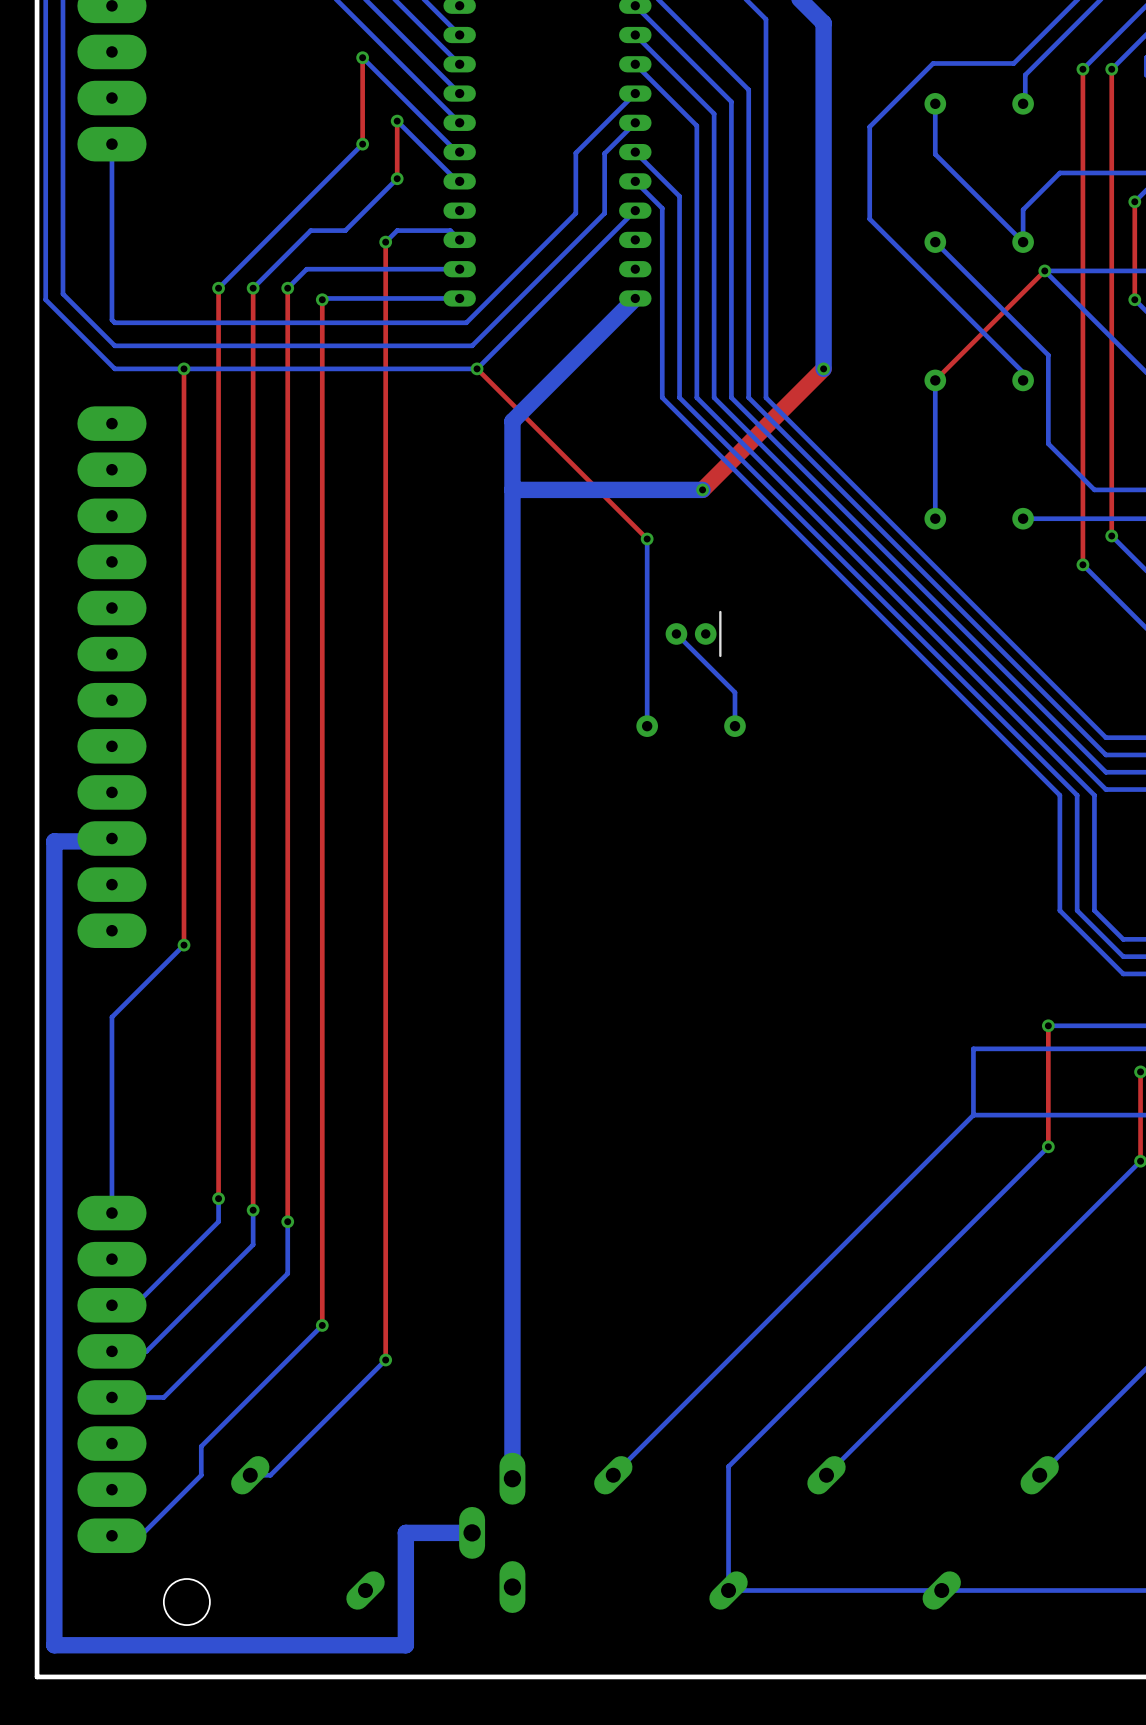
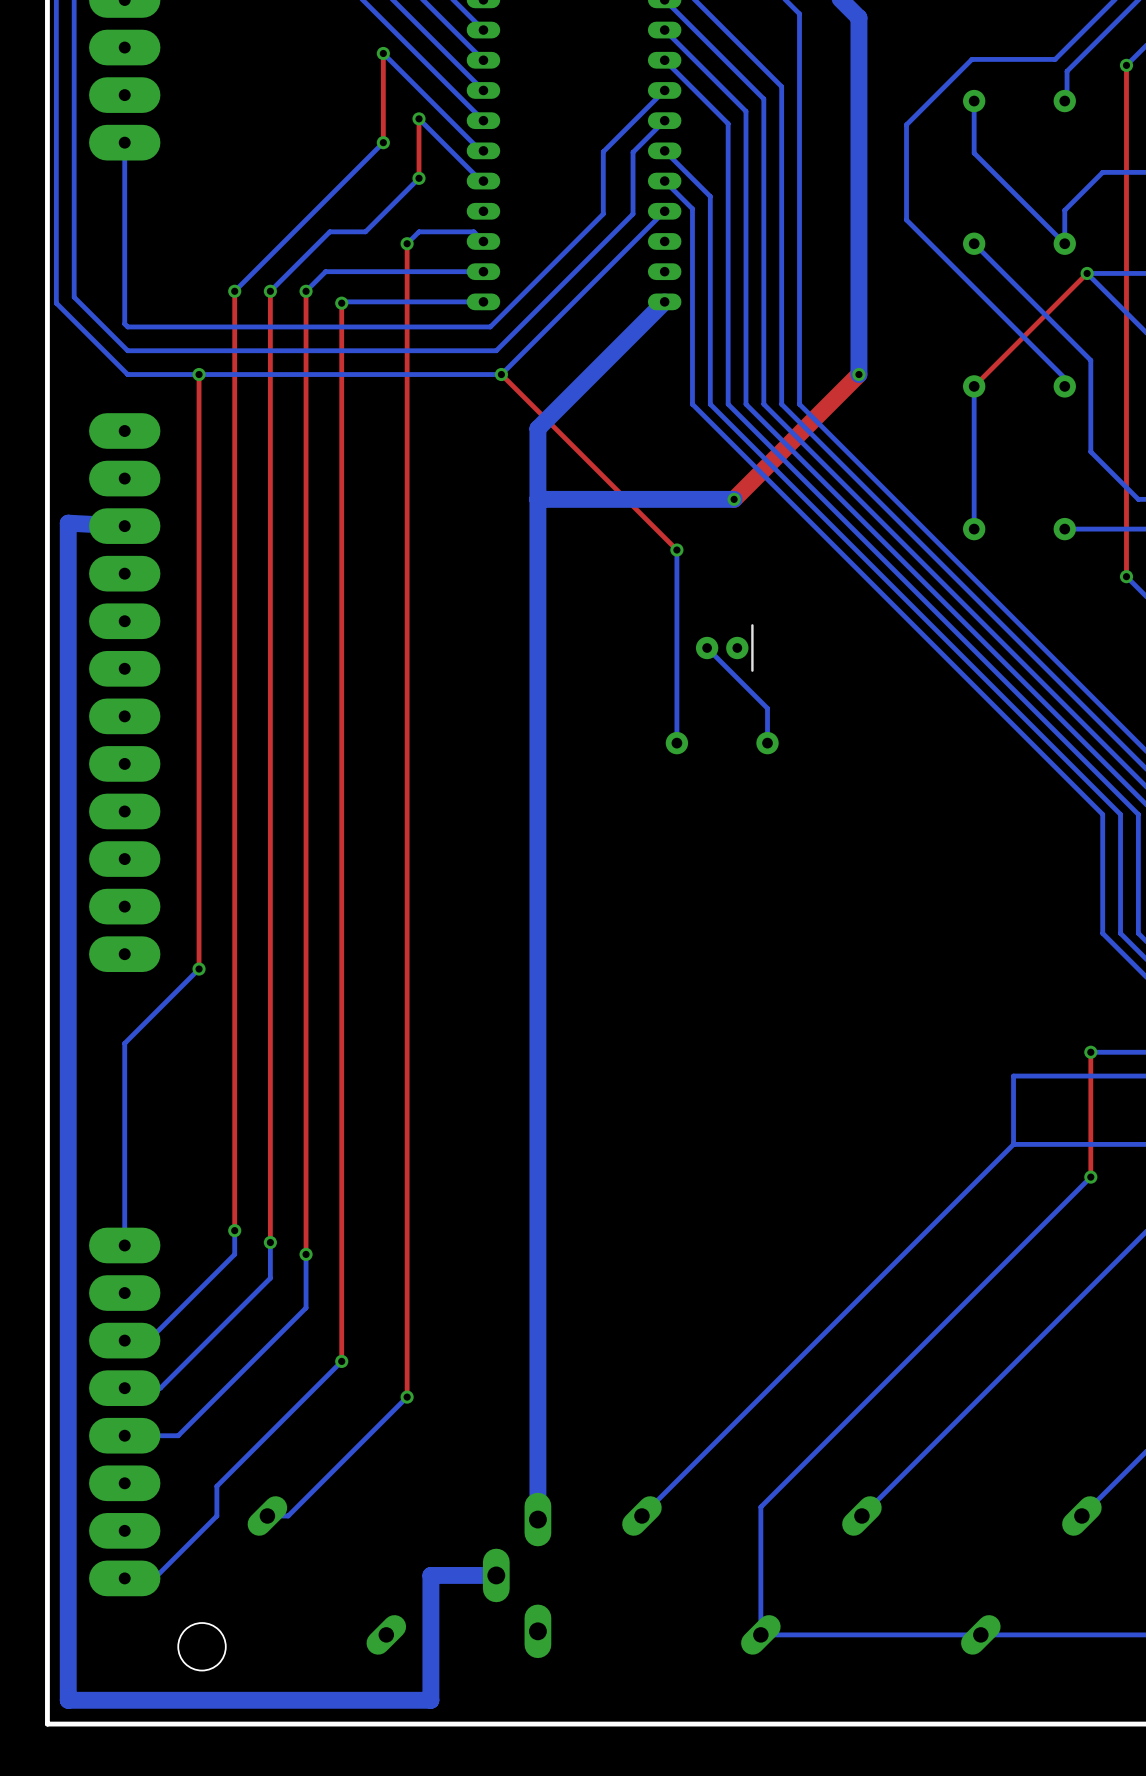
bottom track: (111, 838) (111, 841) (54, 841) (54, 1645) (405, 1645) (405, 1532) (408, 1532) -> (124, 526) (68, 523) (68, 1700) (430, 1700) (430, 1575)

